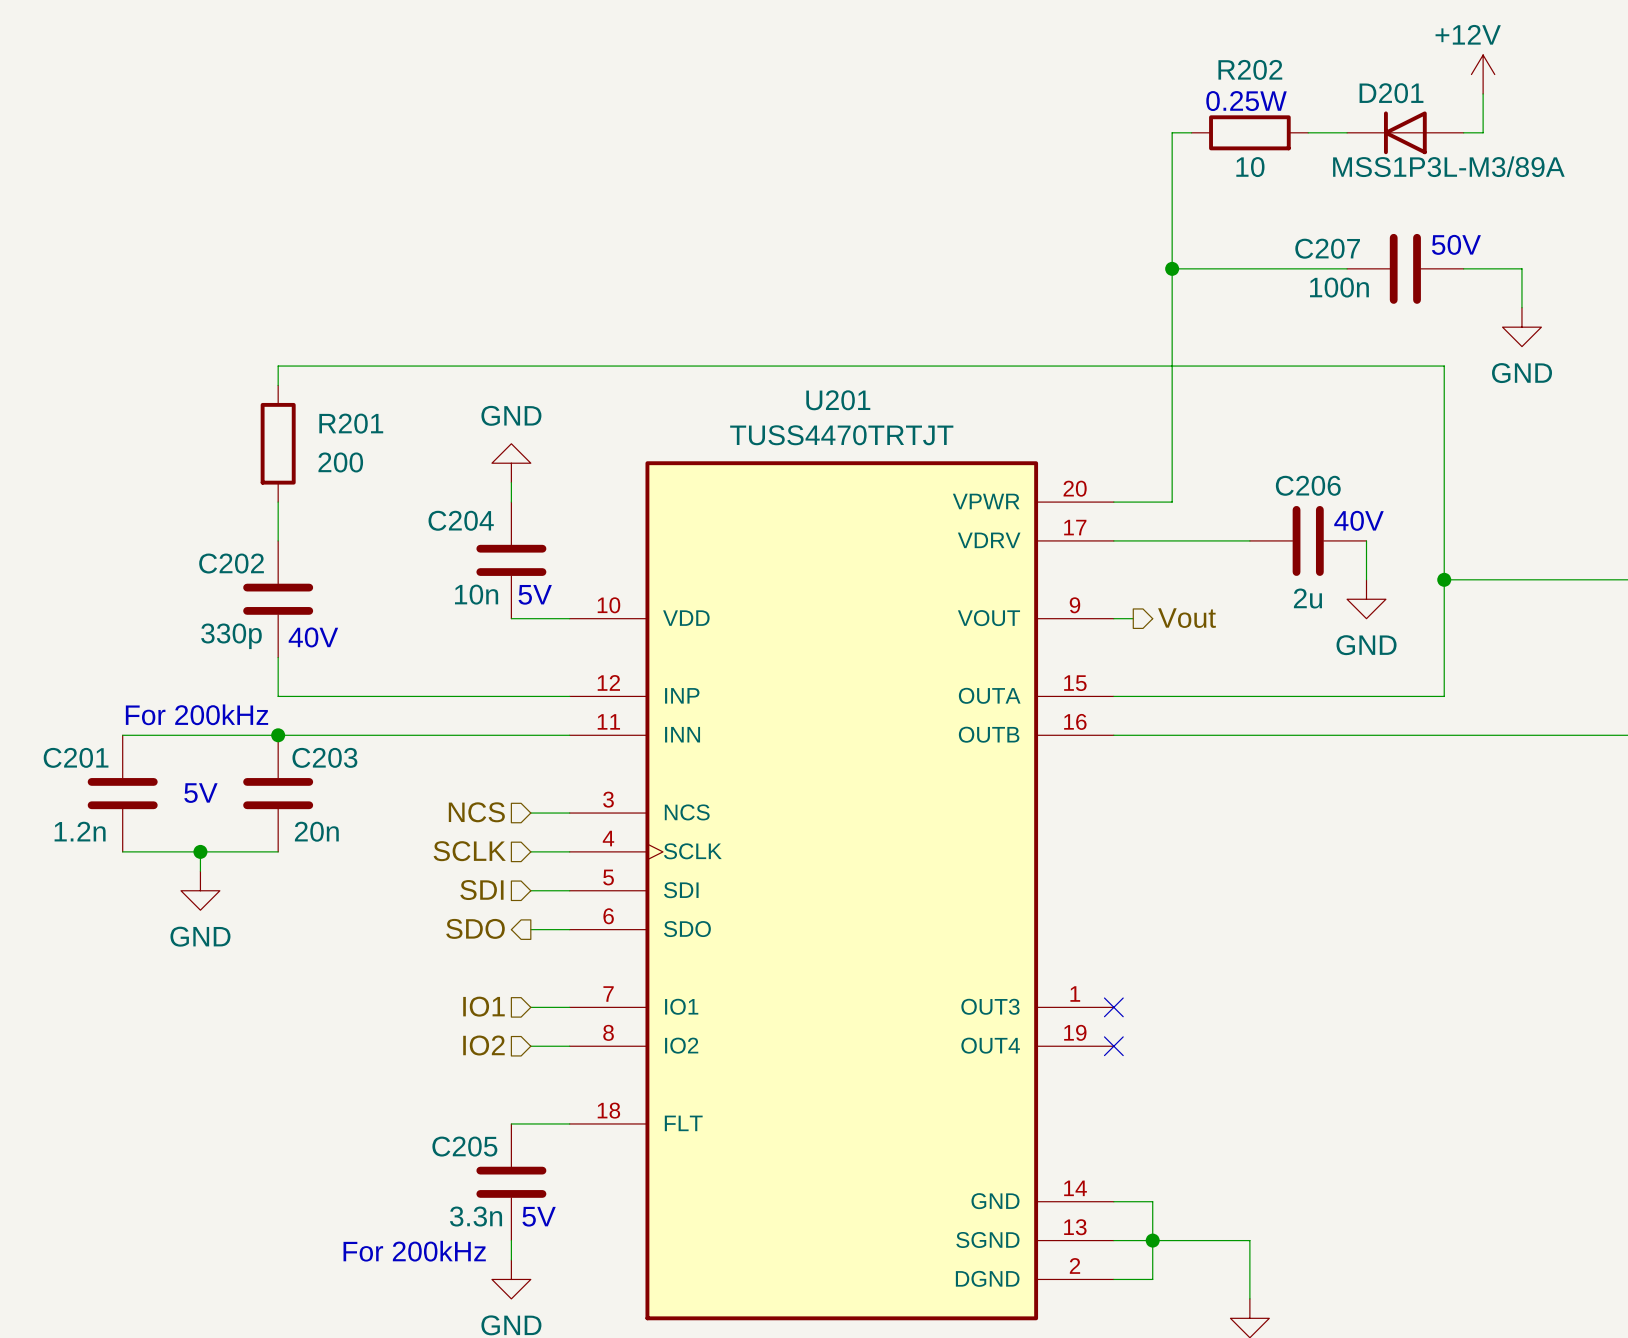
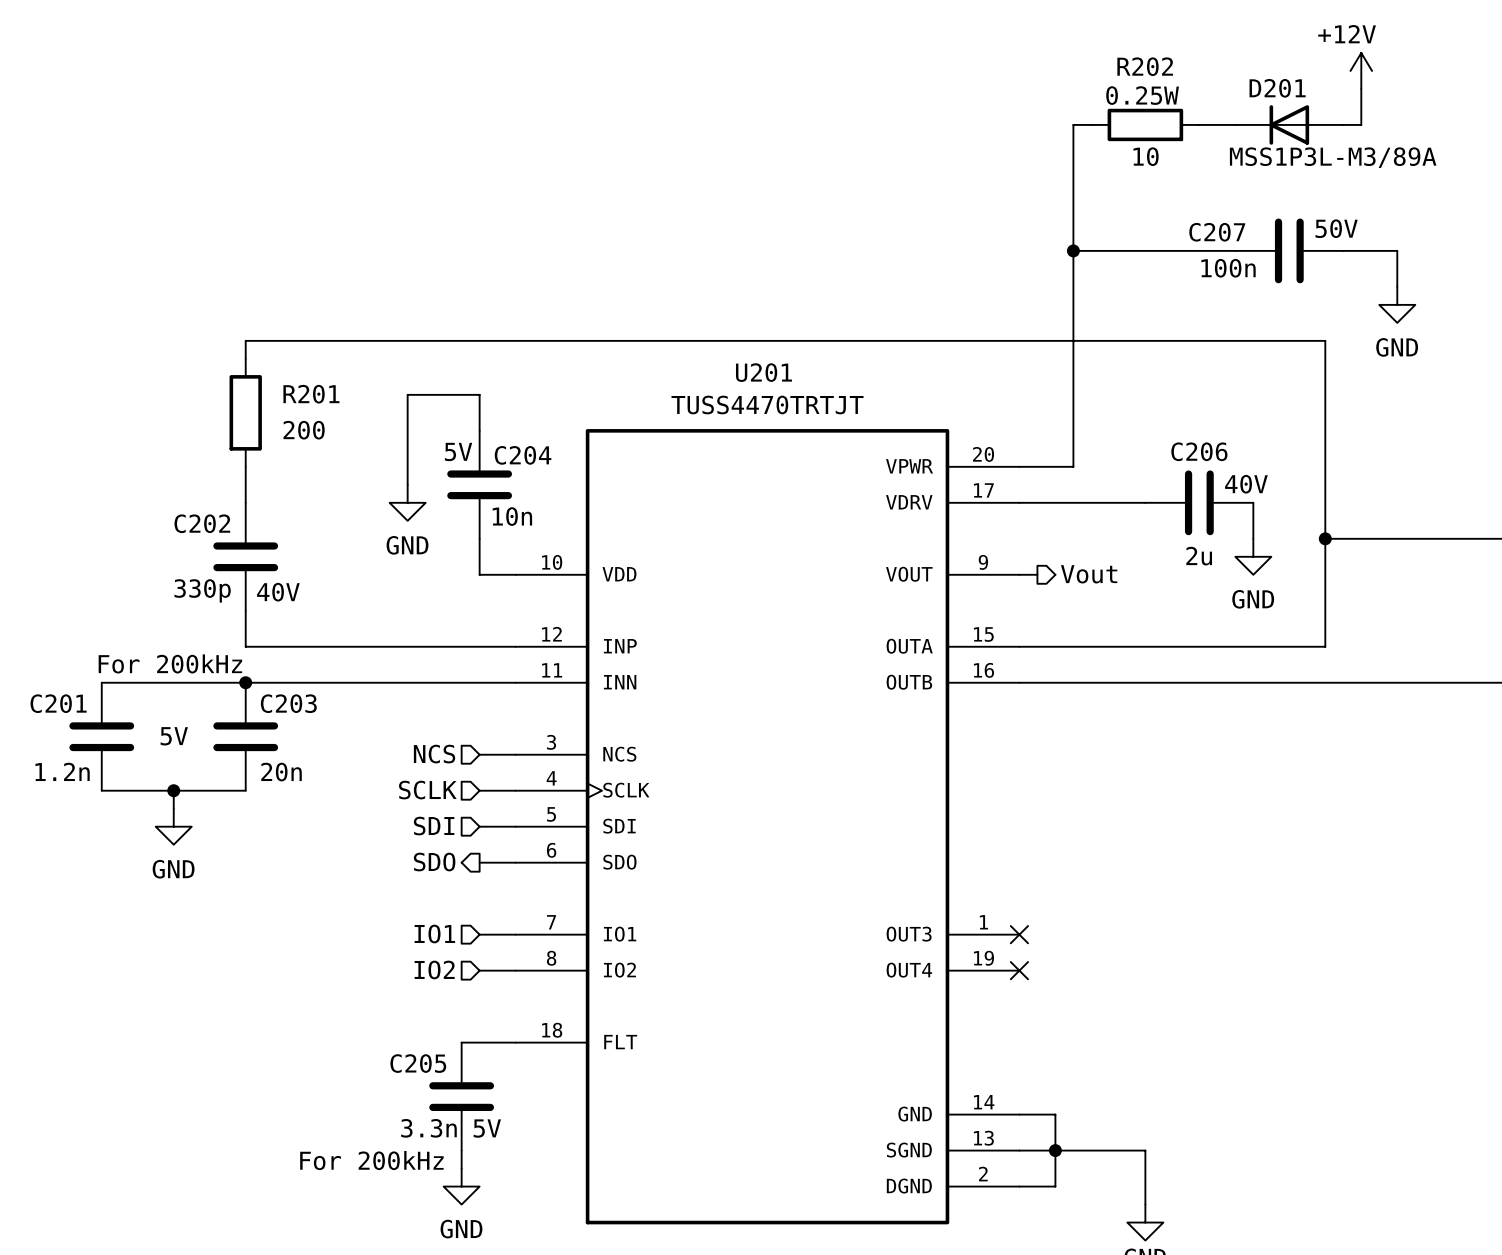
power symbol rotation: 0° (511, 463) -> 180° (407, 502)
power symbol position: GND (511, 463) -> GND (407, 502)
wire: none -> (479, 430) (479, 394) (407, 394) (407, 484)
wire: (511, 482) (511, 502) -> none
C204 name position: C204 (461, 520) -> C204 (523, 455)
C204 position: (511, 560) -> (479, 484)
C204 value position: 10n (476, 594) -> 10n (512, 516)
text position: 5V (535, 594) -> 5V (458, 452)
wire: (511, 618) (530, 618) -> (479, 538) (479, 574)

